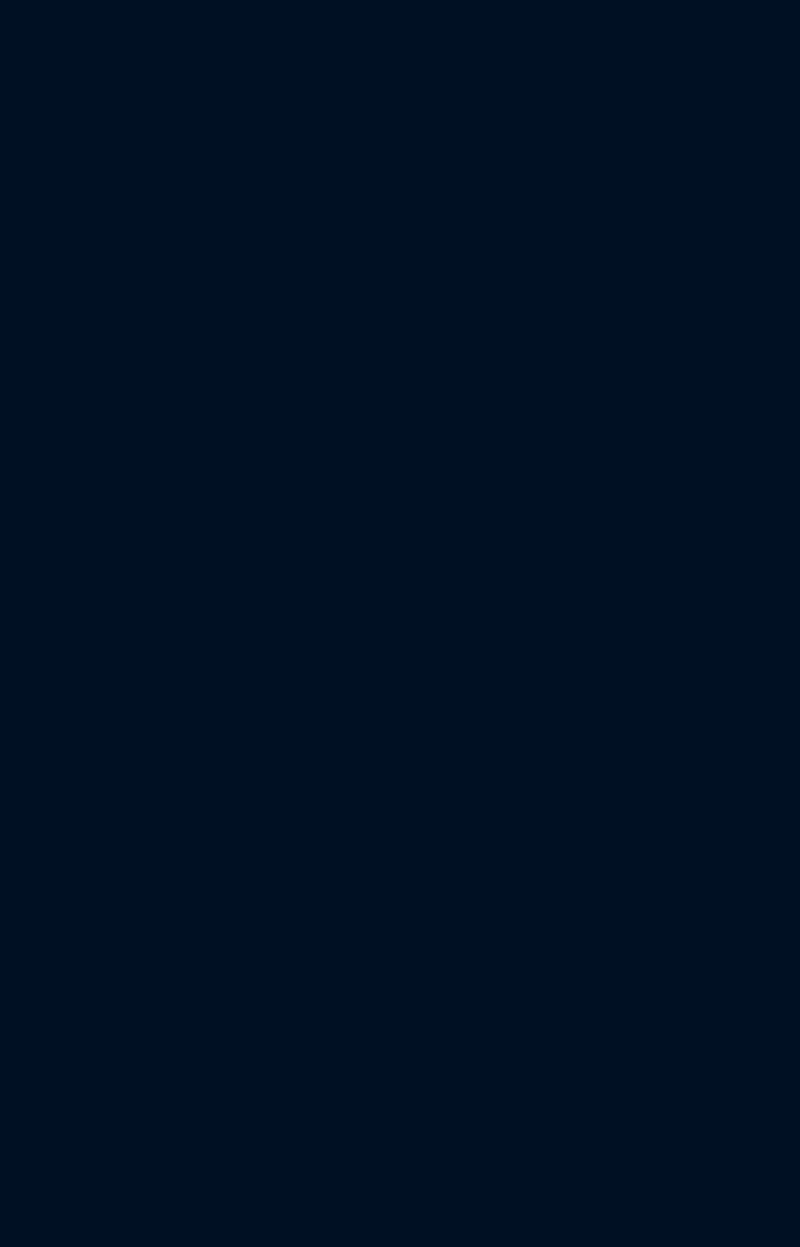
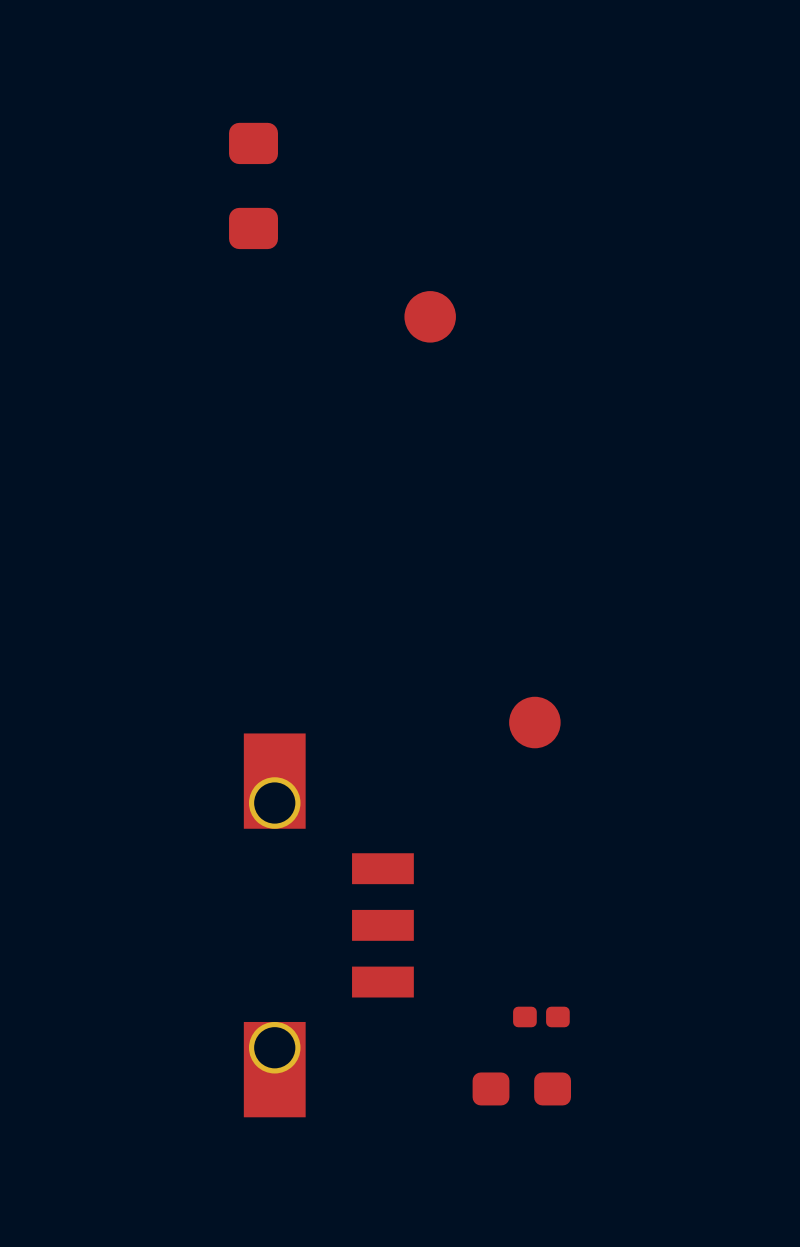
part: none -> (253, 185)
part: none -> (430, 316)
part: none -> (534, 722)
part: none -> (328, 925)
part: none -> (541, 1016)
part: none -> (521, 1088)

